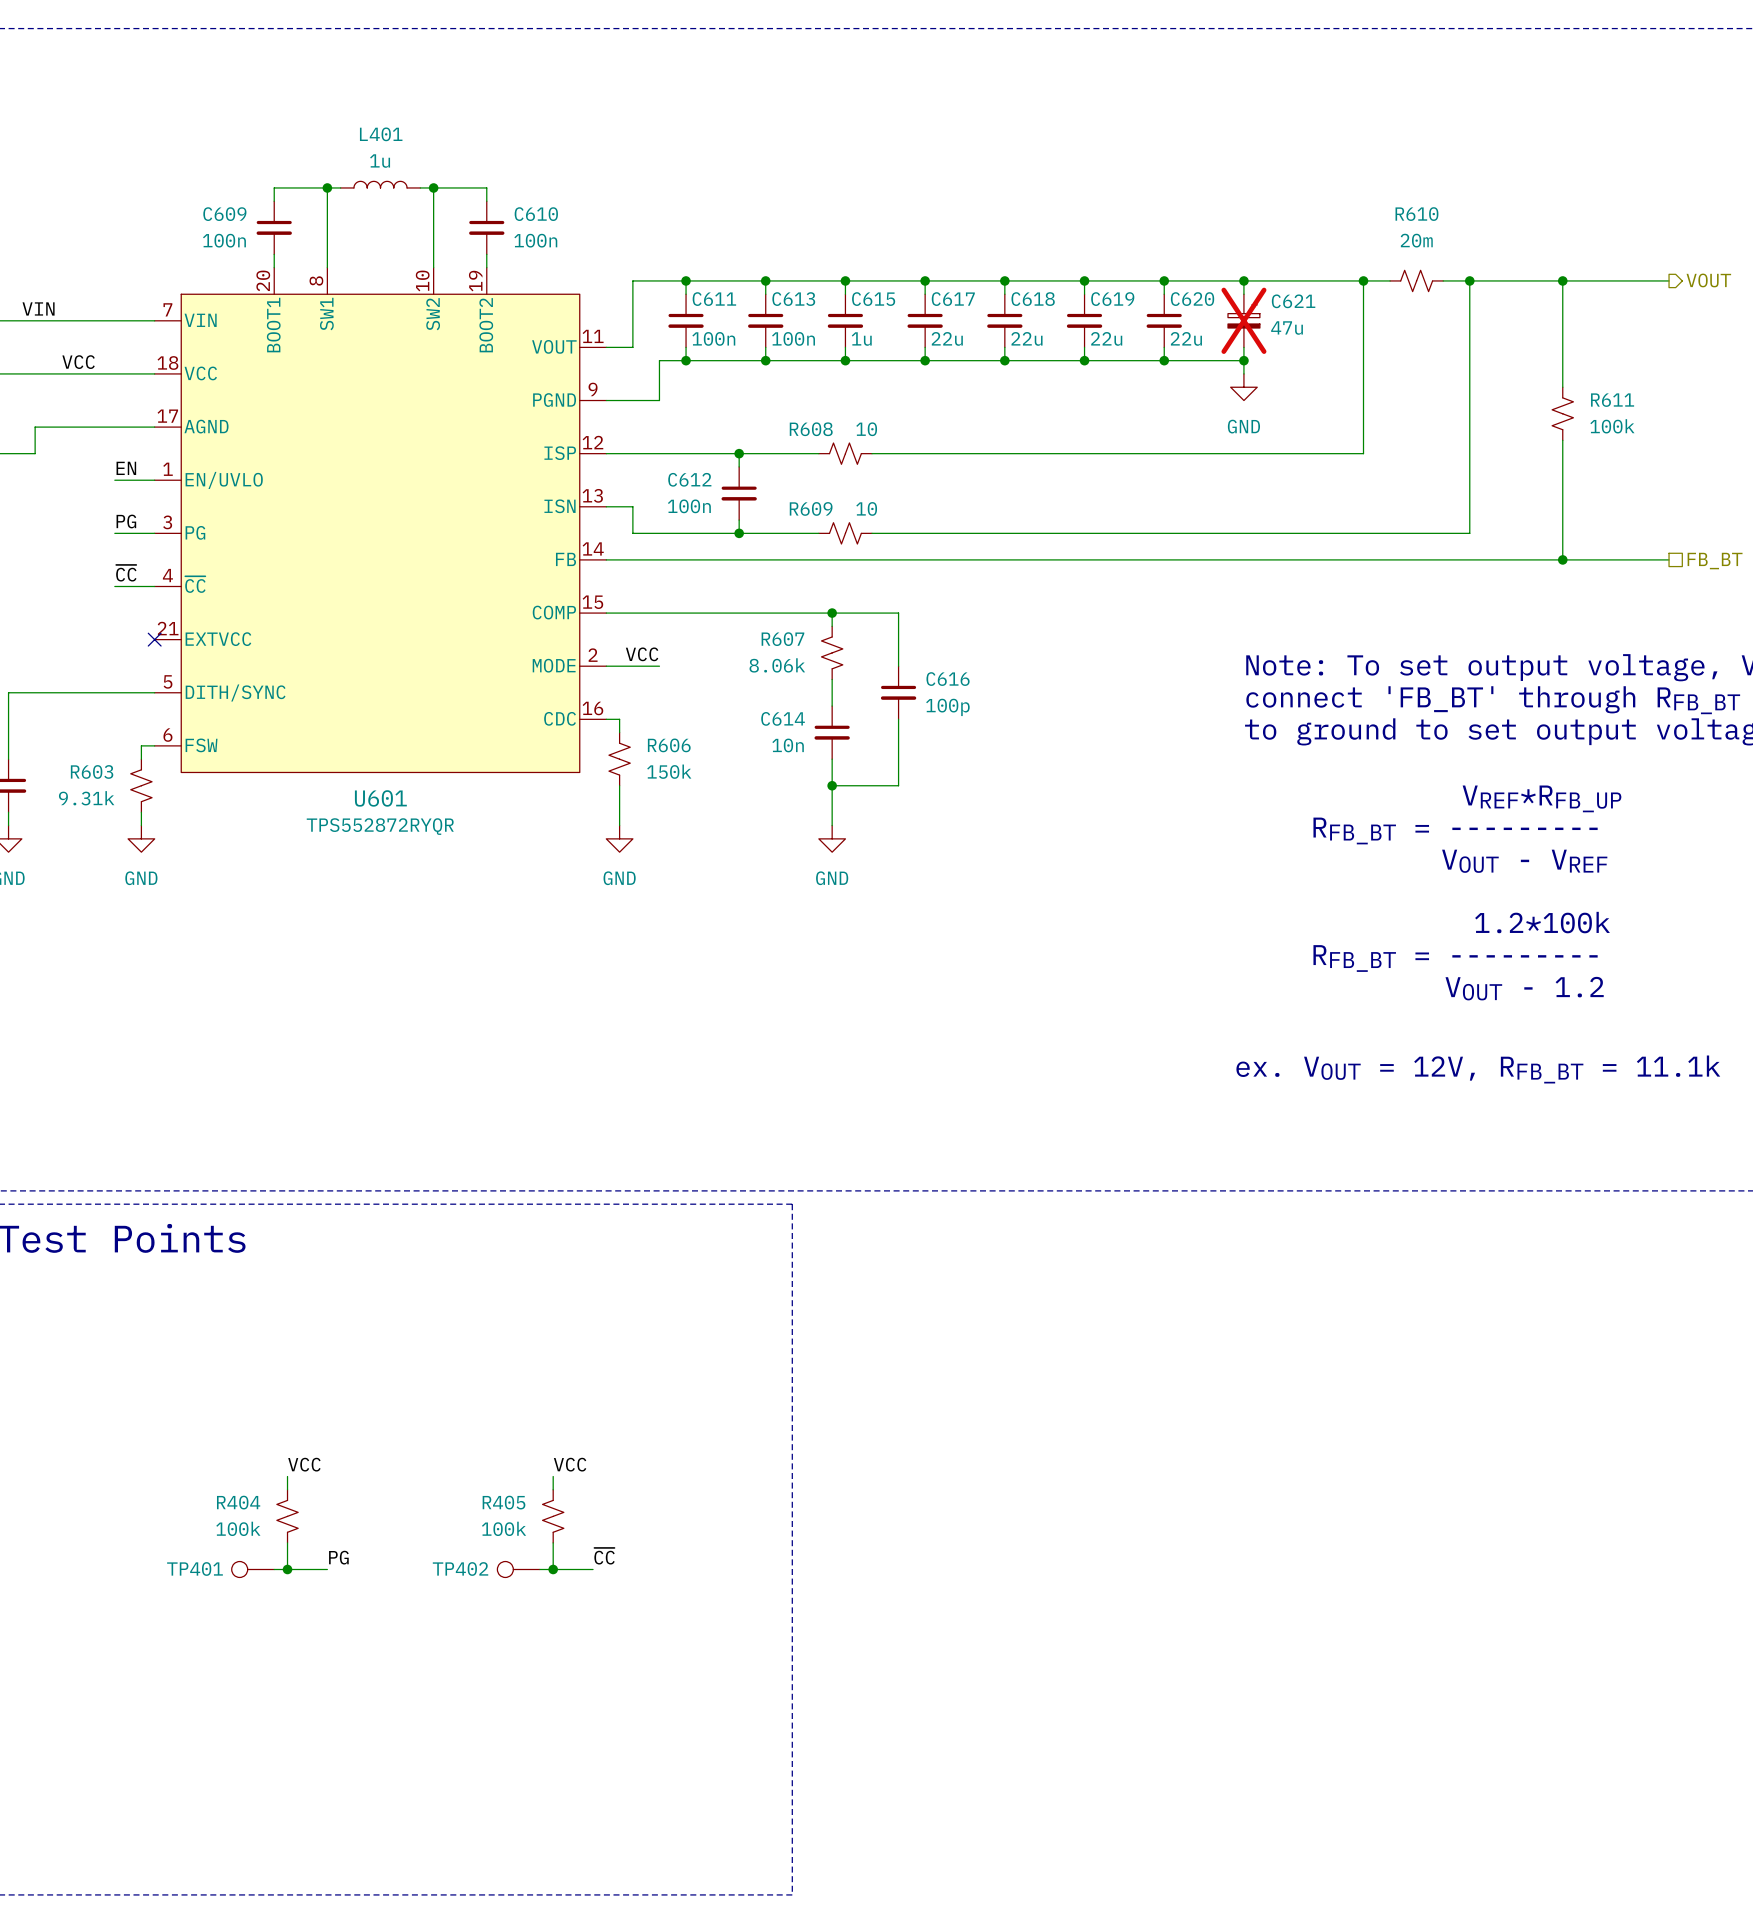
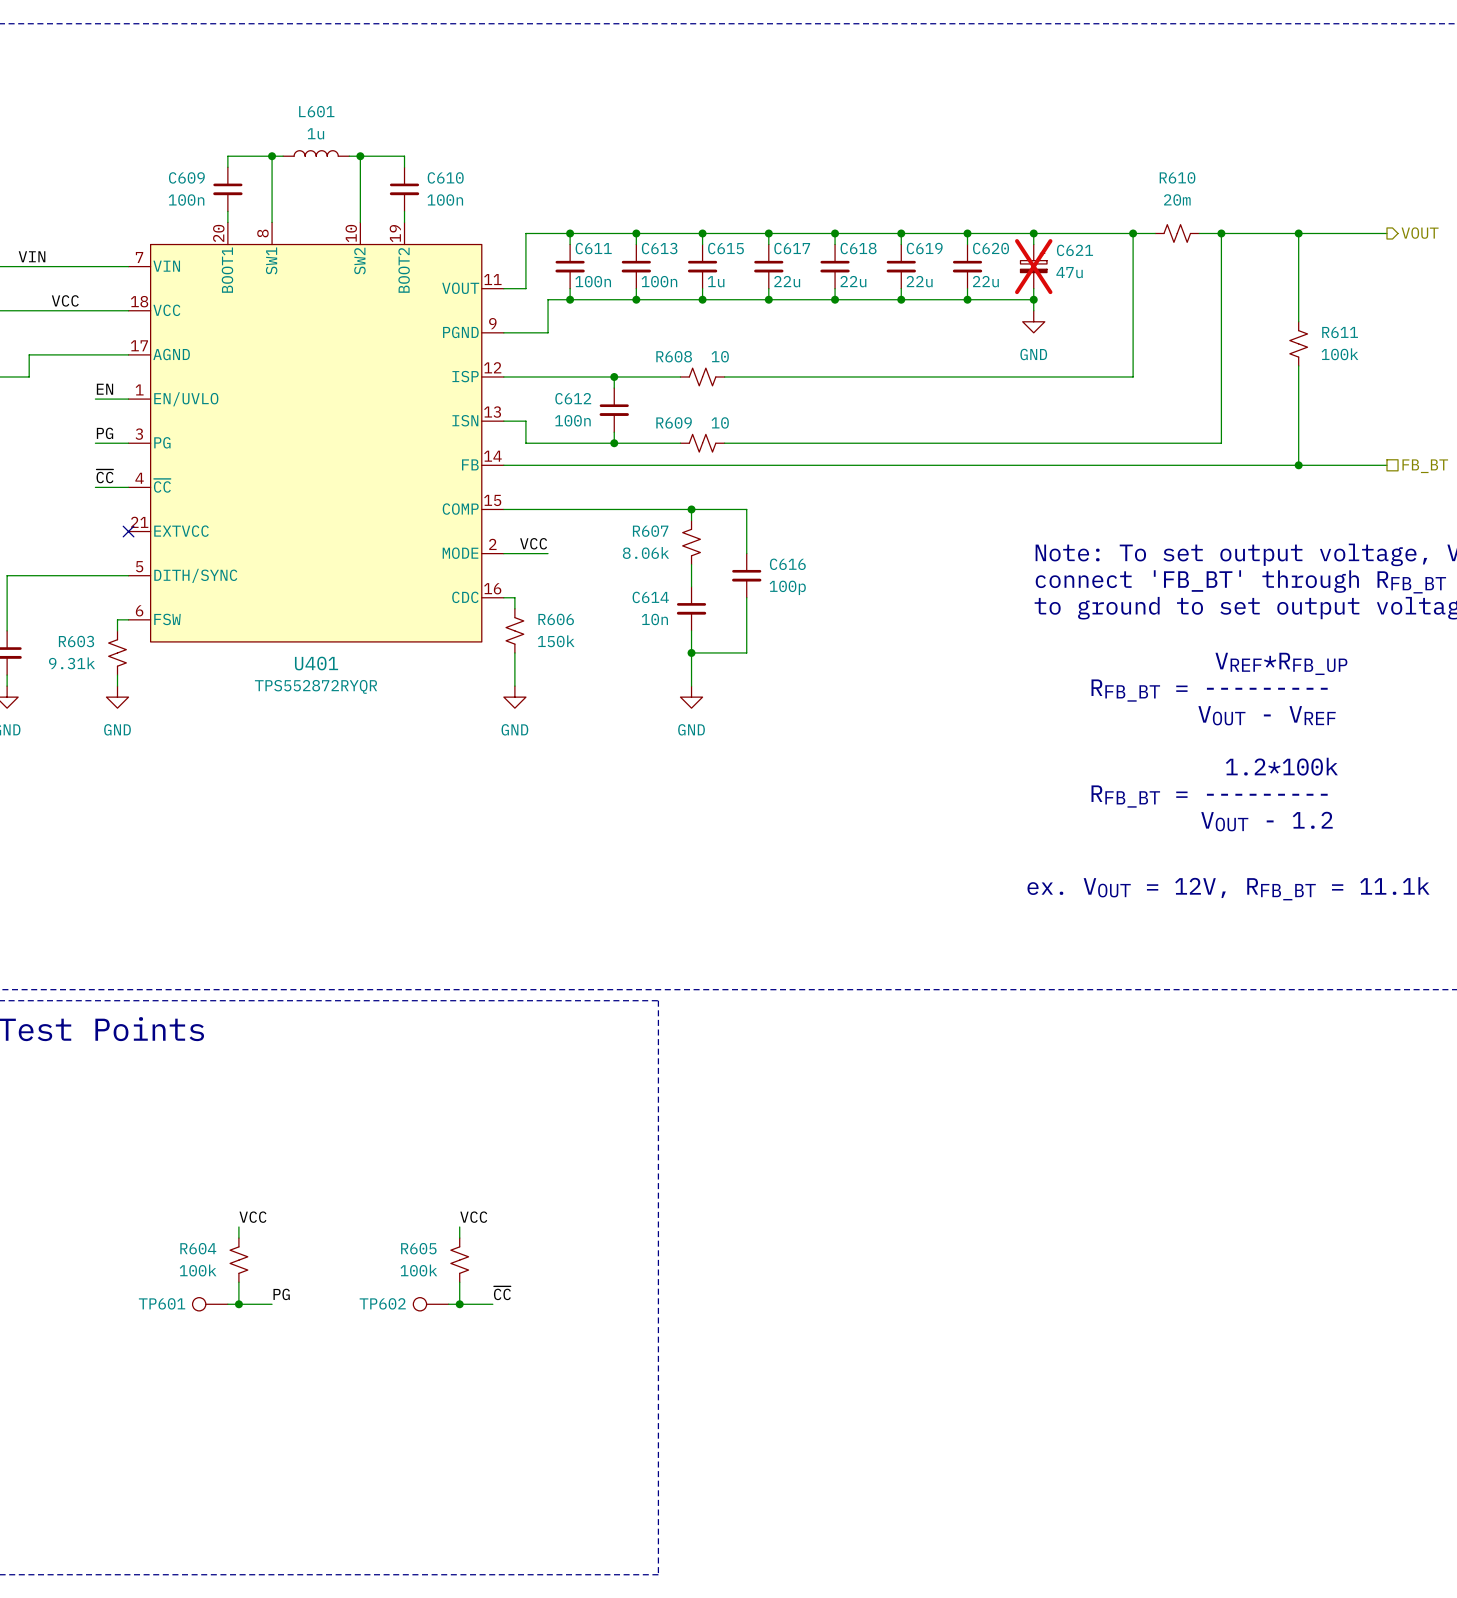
L401 name: L401 (381, 134) -> L601 (316, 111)
U601 name: U601 (380, 798) -> U401 (316, 663)
R404 name: R404 (238, 1502) -> R604 (198, 1248)
R405 name: R405 (504, 1502) -> R605 (418, 1248)
TP401 name: TP401 (194, 1569) -> TP601 (162, 1303)
TP402 name: TP402 (460, 1569) -> TP602 (382, 1303)

